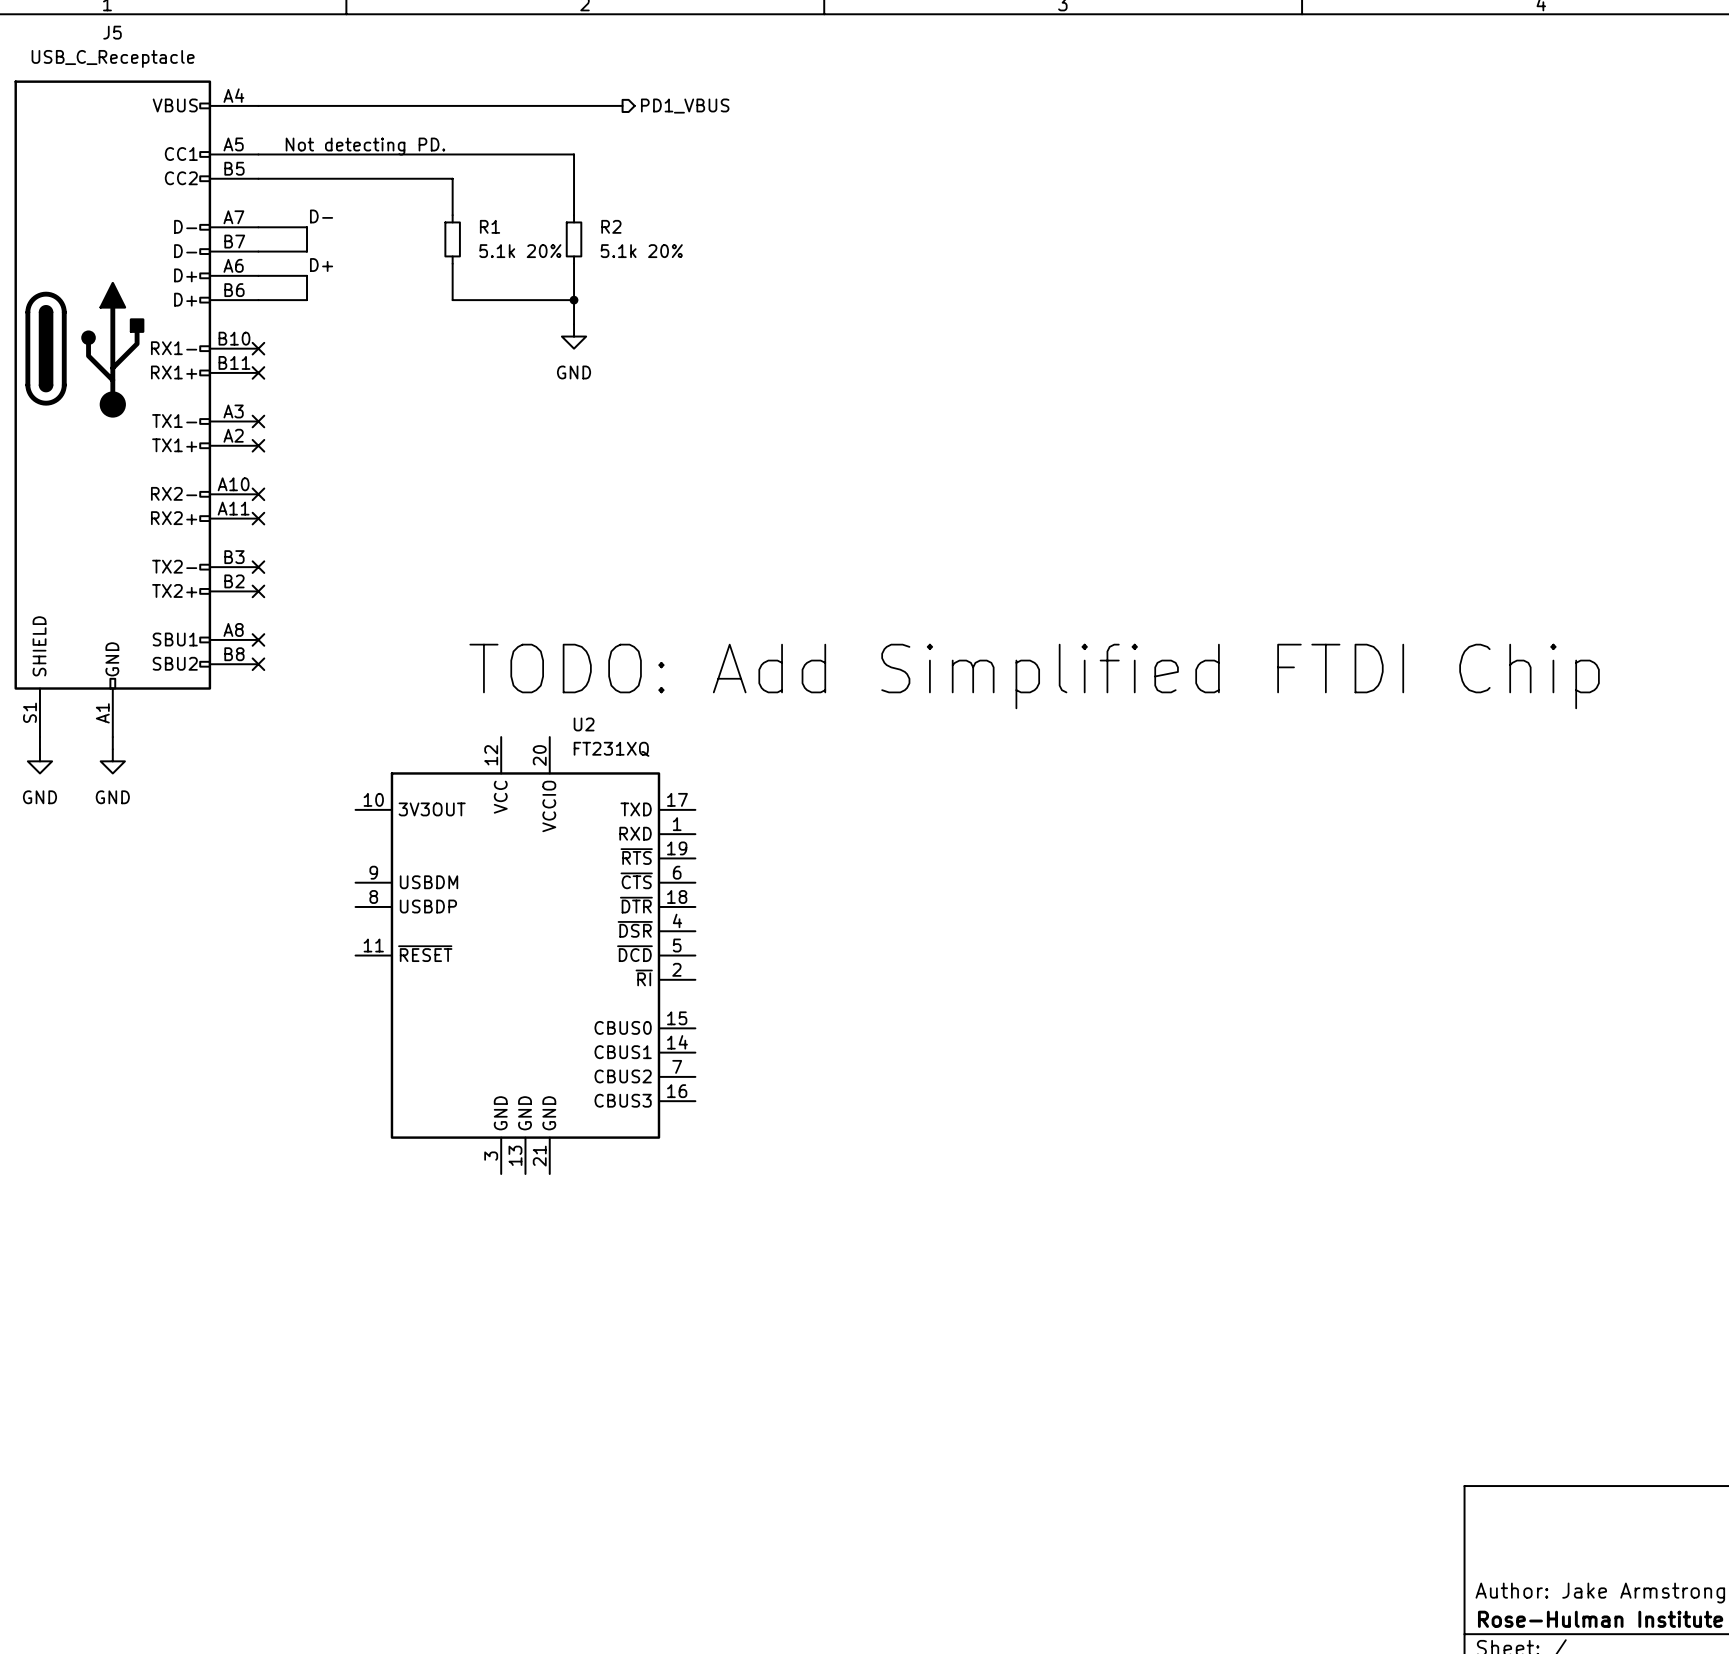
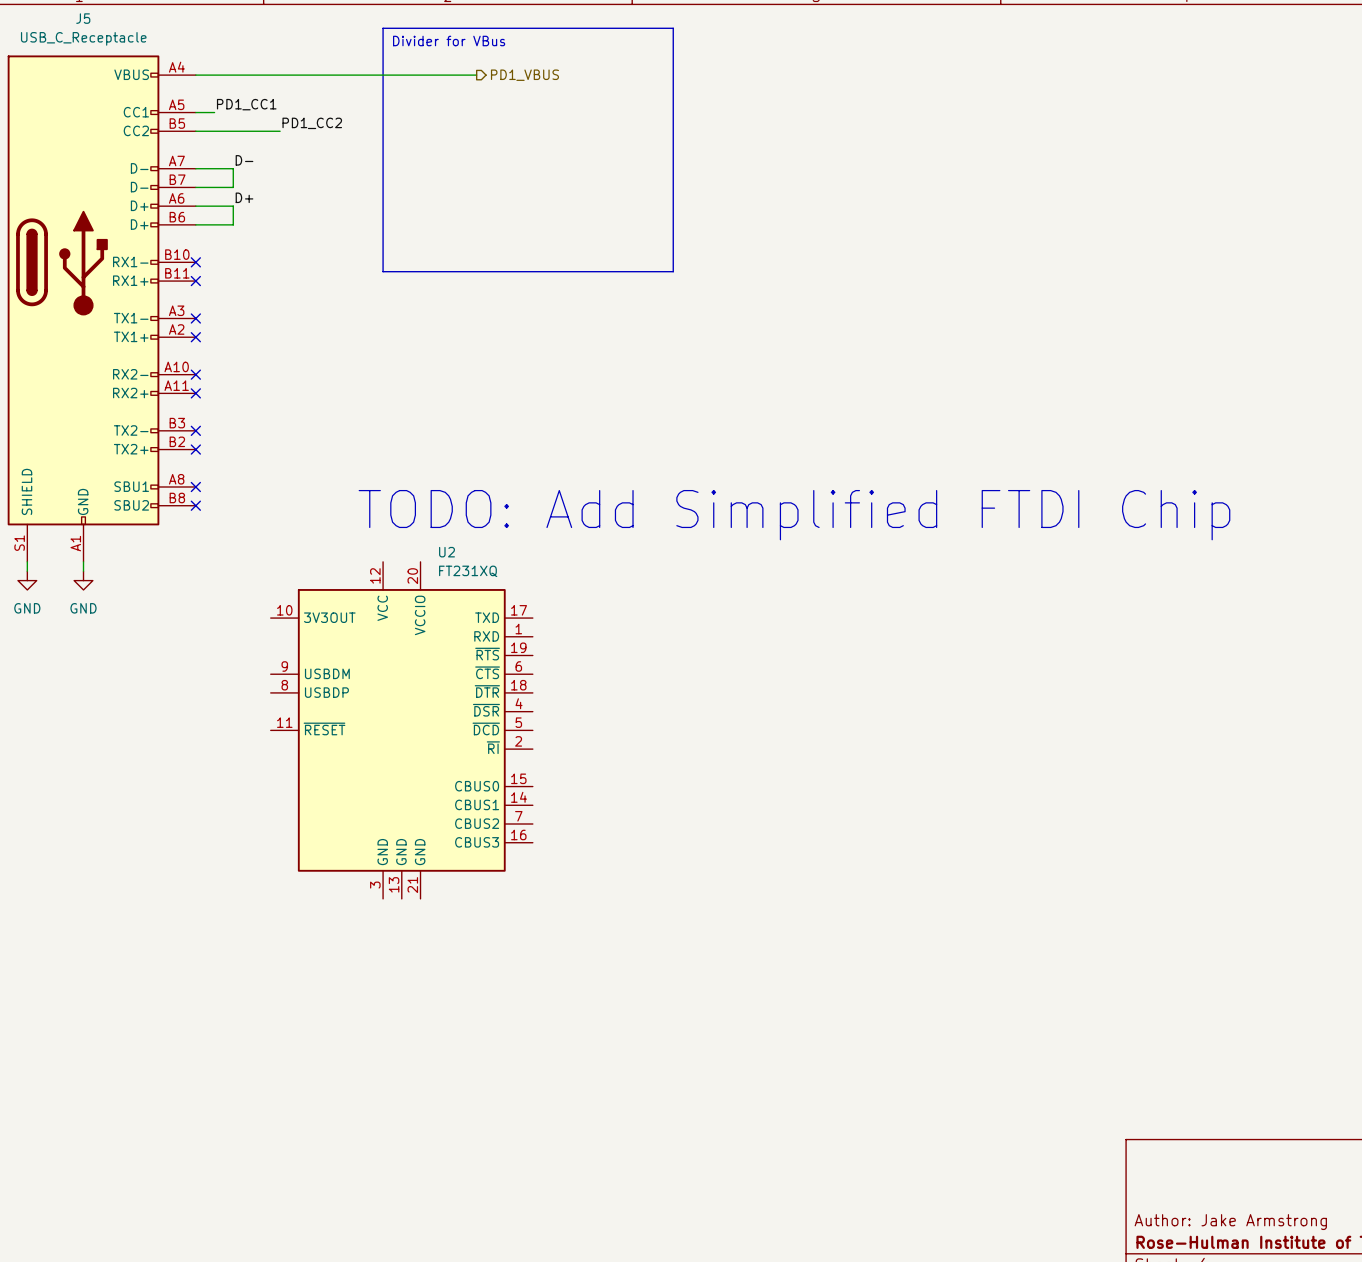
line: none -> (383, 28) (673, 28) (673, 271) (383, 271) (383, 28)
text: none -> Divider for VBus (449, 41)
label: none -> PD1_CC1 (246, 104)
text: Not detecting PD. (365, 146) -> none
wire: (282, 154) (574, 154) (574, 215) -> none
label: none -> PD1_CC2 (312, 123)
wire: (367, 178) (452, 178) (452, 215) -> none
R1: 5.1k 20% (452, 239) -> none
R2: 5.1k 20% (574, 239) -> none
wire: (452, 263) (452, 300) (574, 300) -> none
wire: (574, 263) (574, 324) -> none
junction: (574, 300) -> none
power symbol: GND (574, 336) -> none

